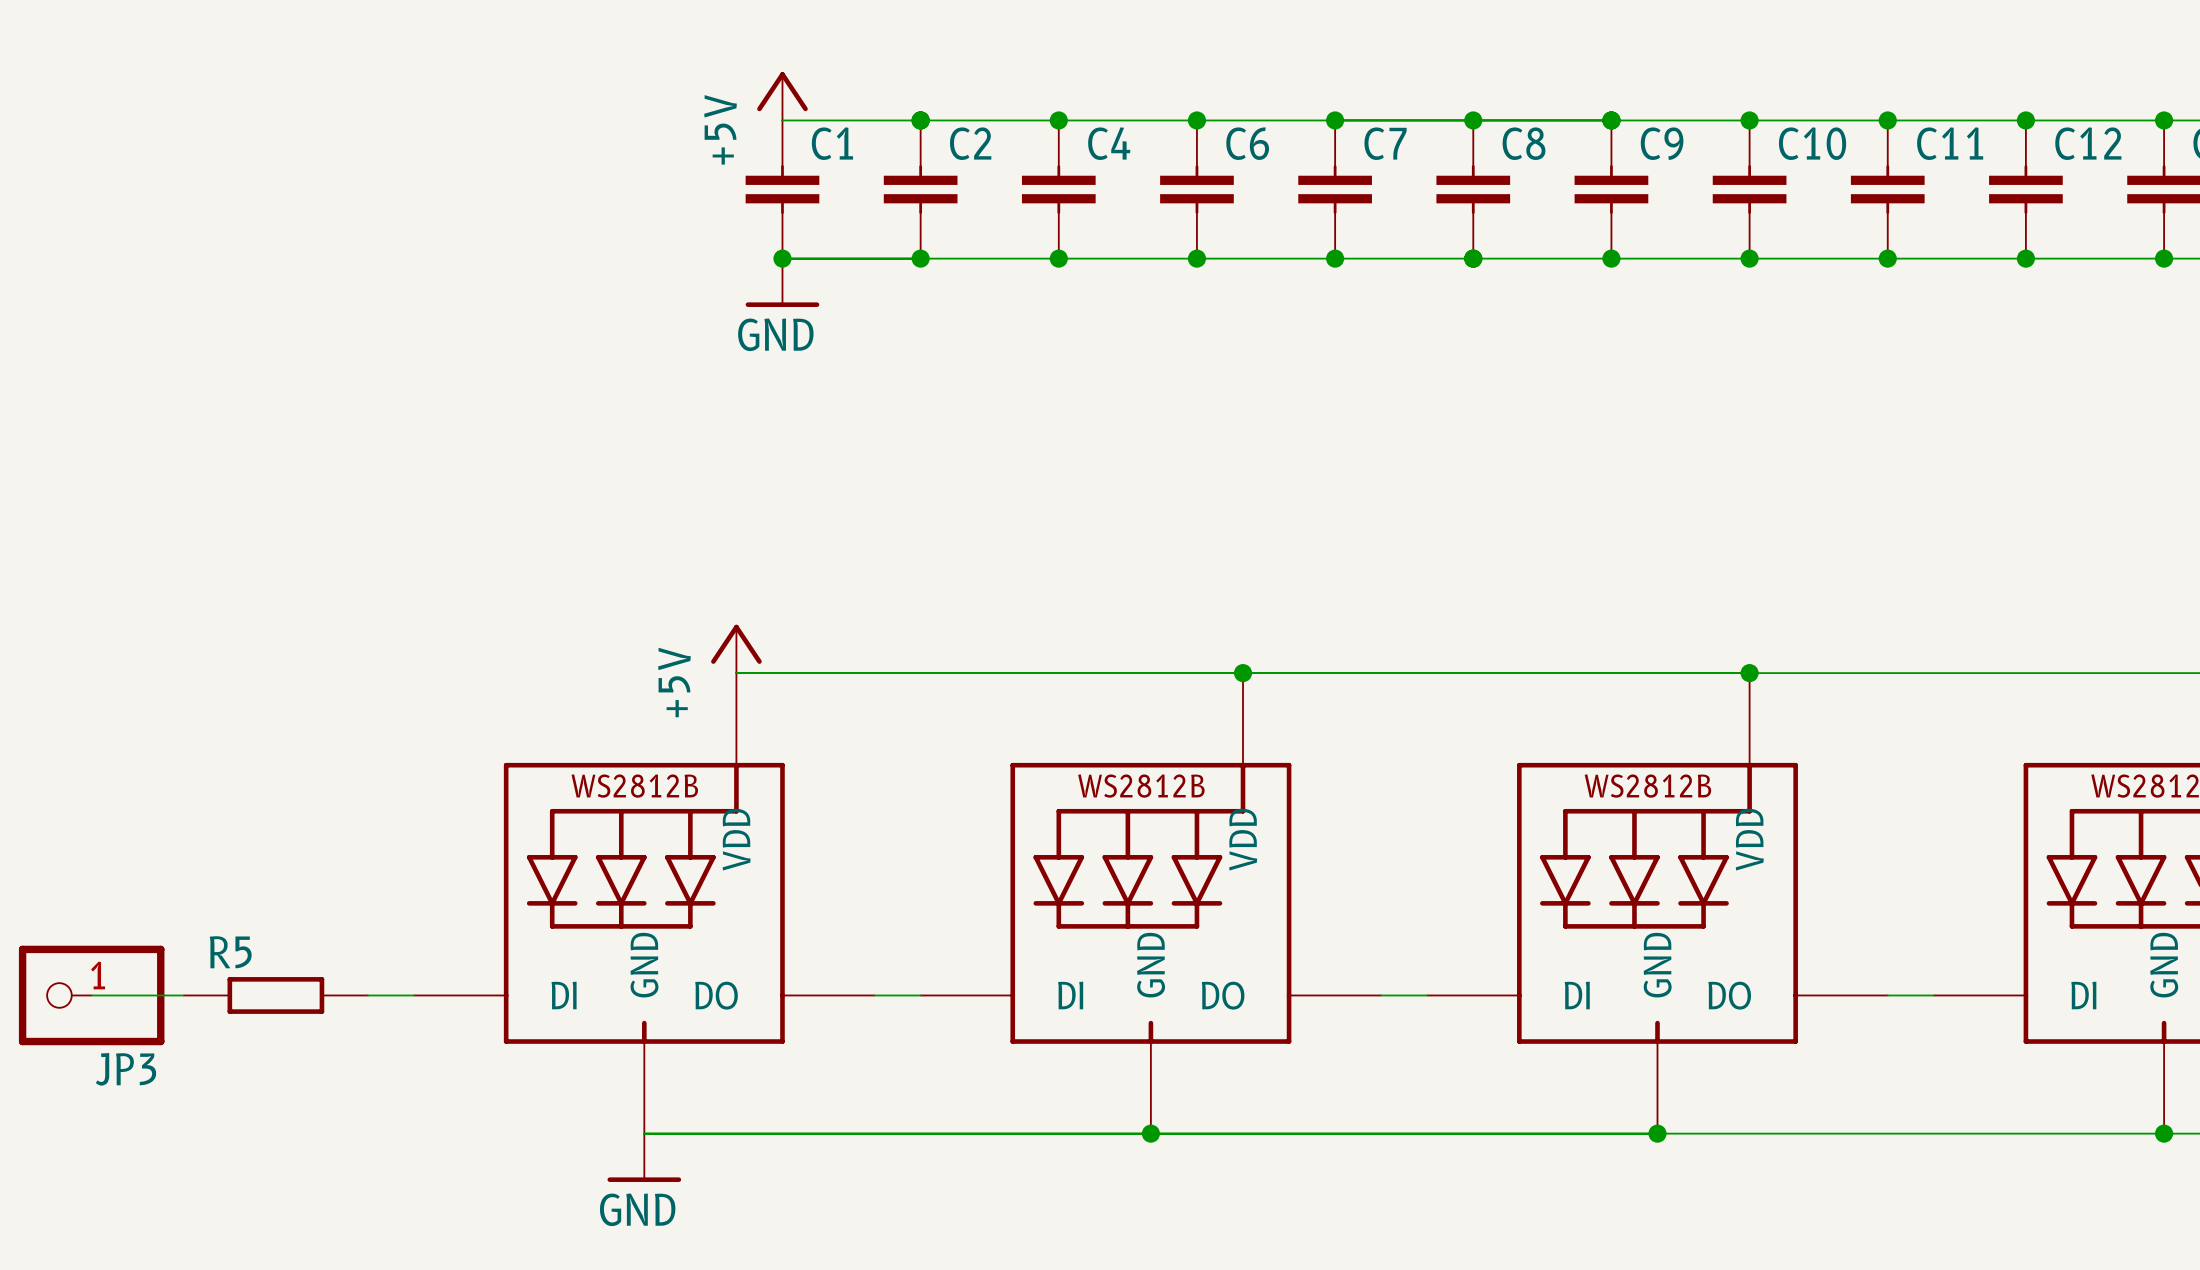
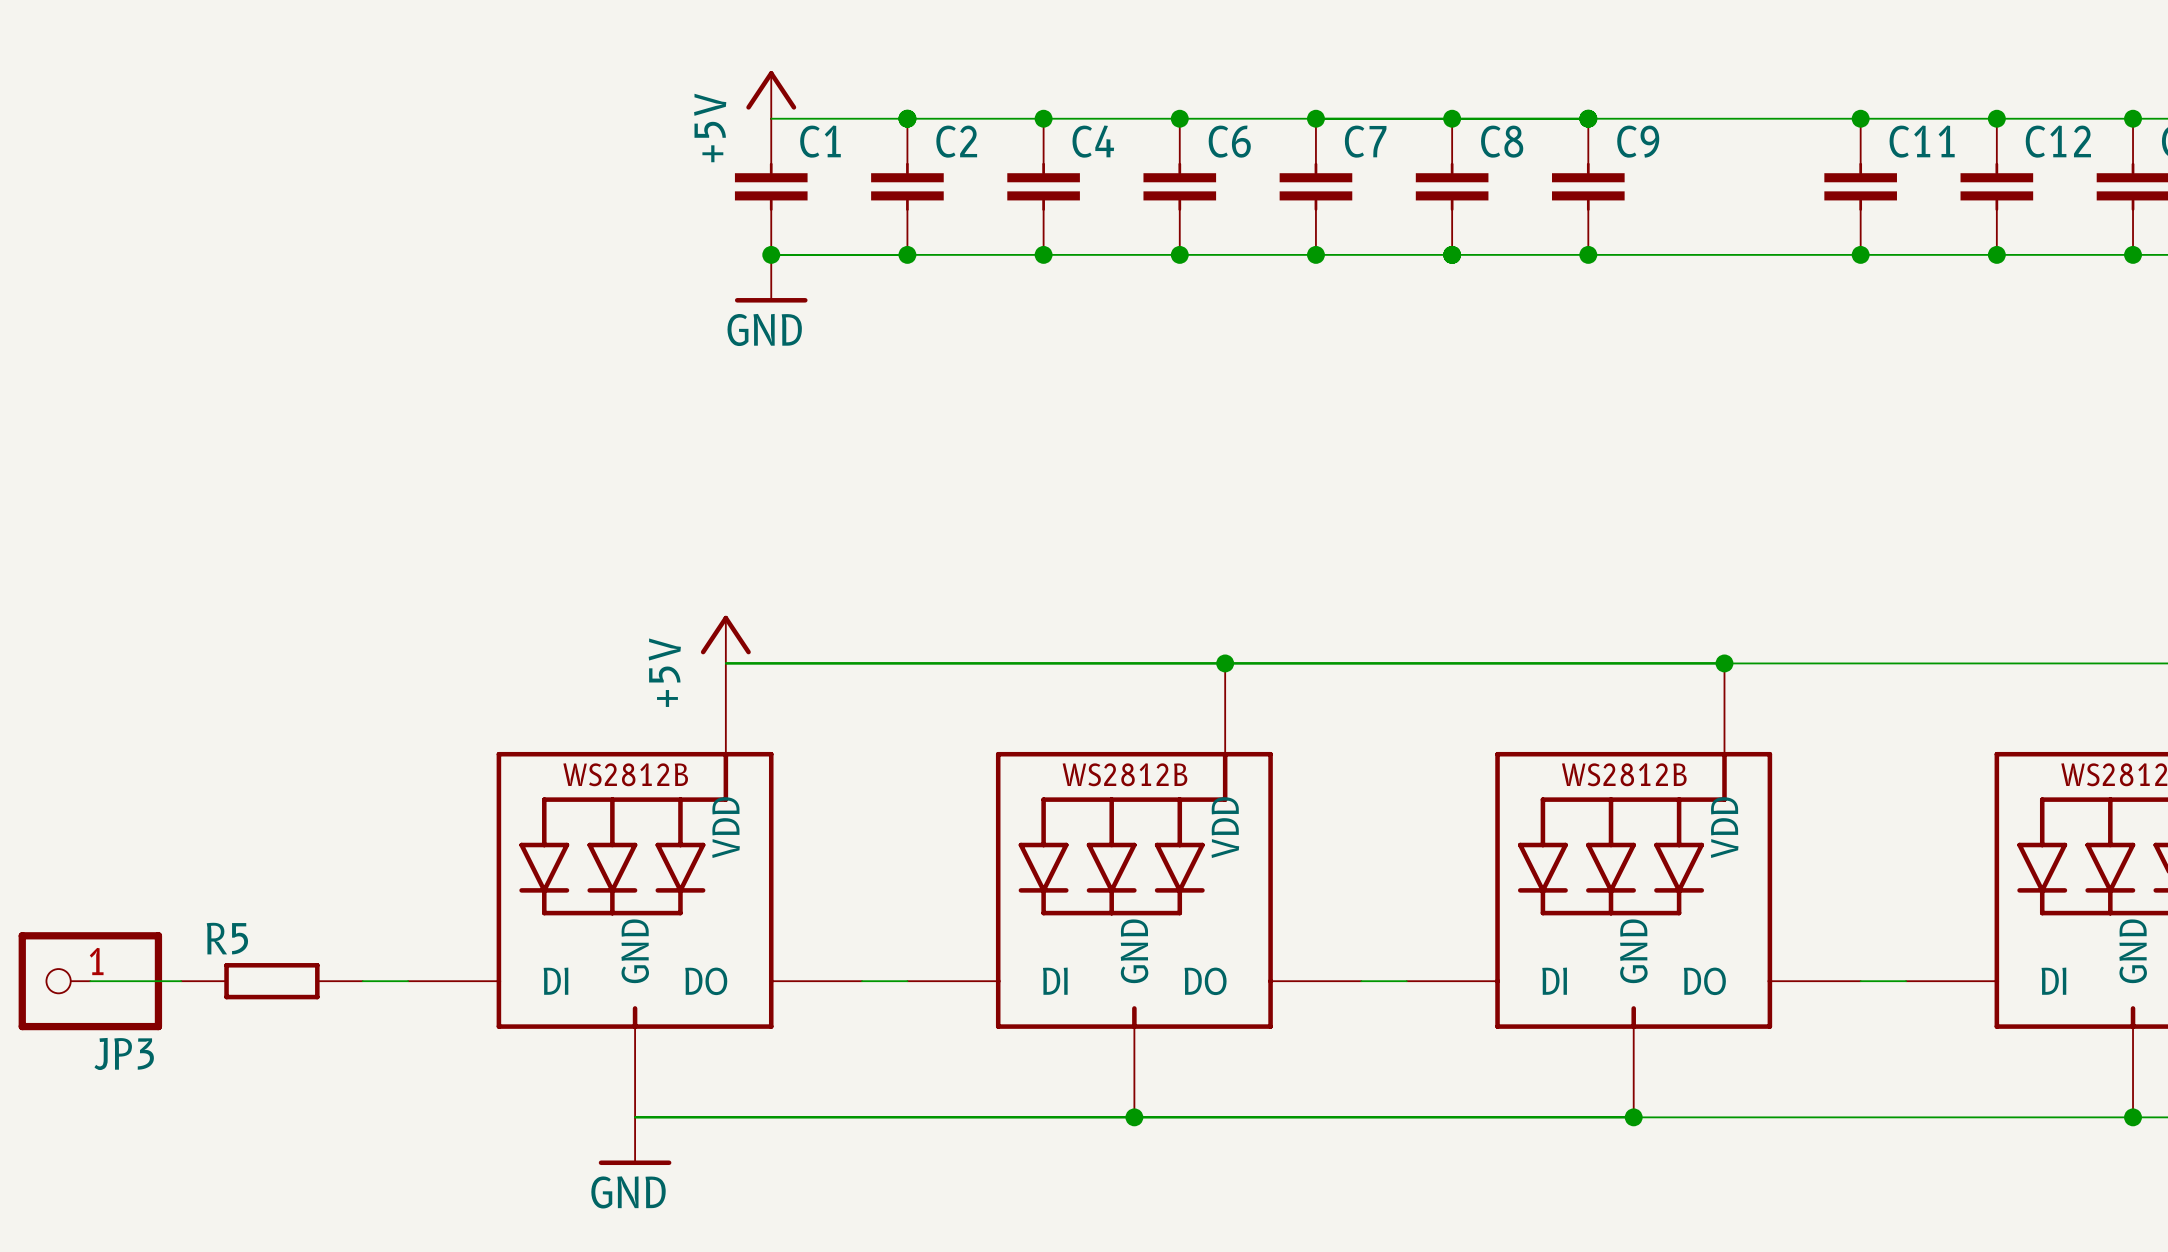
junction: (1749, 120) -> none
C10: (1749, 189) -> none
junction: (1749, 258) -> none

